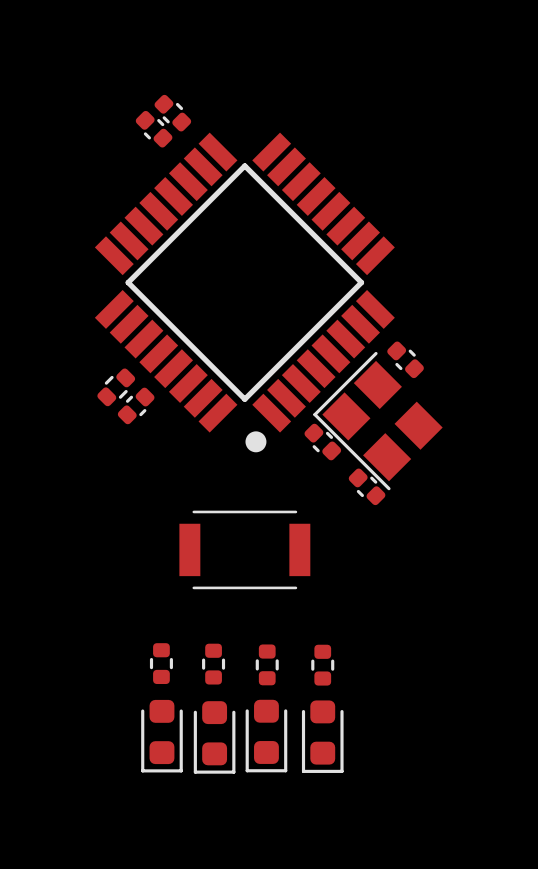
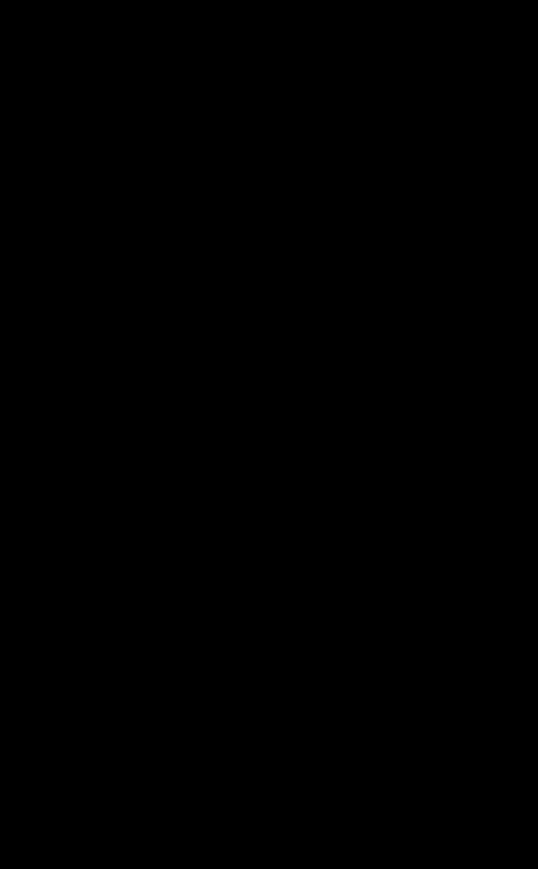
part: (172, 113) -> none
part: (154, 129) -> none
part: (244, 292) -> none
part: (405, 359) -> none
part: (116, 387) -> none
part: (136, 405) -> none
part: (378, 421) -> none
part: (322, 442) -> none
part: (367, 486) -> none
part: (244, 549) -> none
part: (161, 663) -> none
part: (213, 664) -> none
part: (267, 664) -> none
part: (322, 665) -> none
part: (161, 736) -> none
part: (266, 736) -> none
part: (322, 736) -> none
part: (214, 737) -> none

